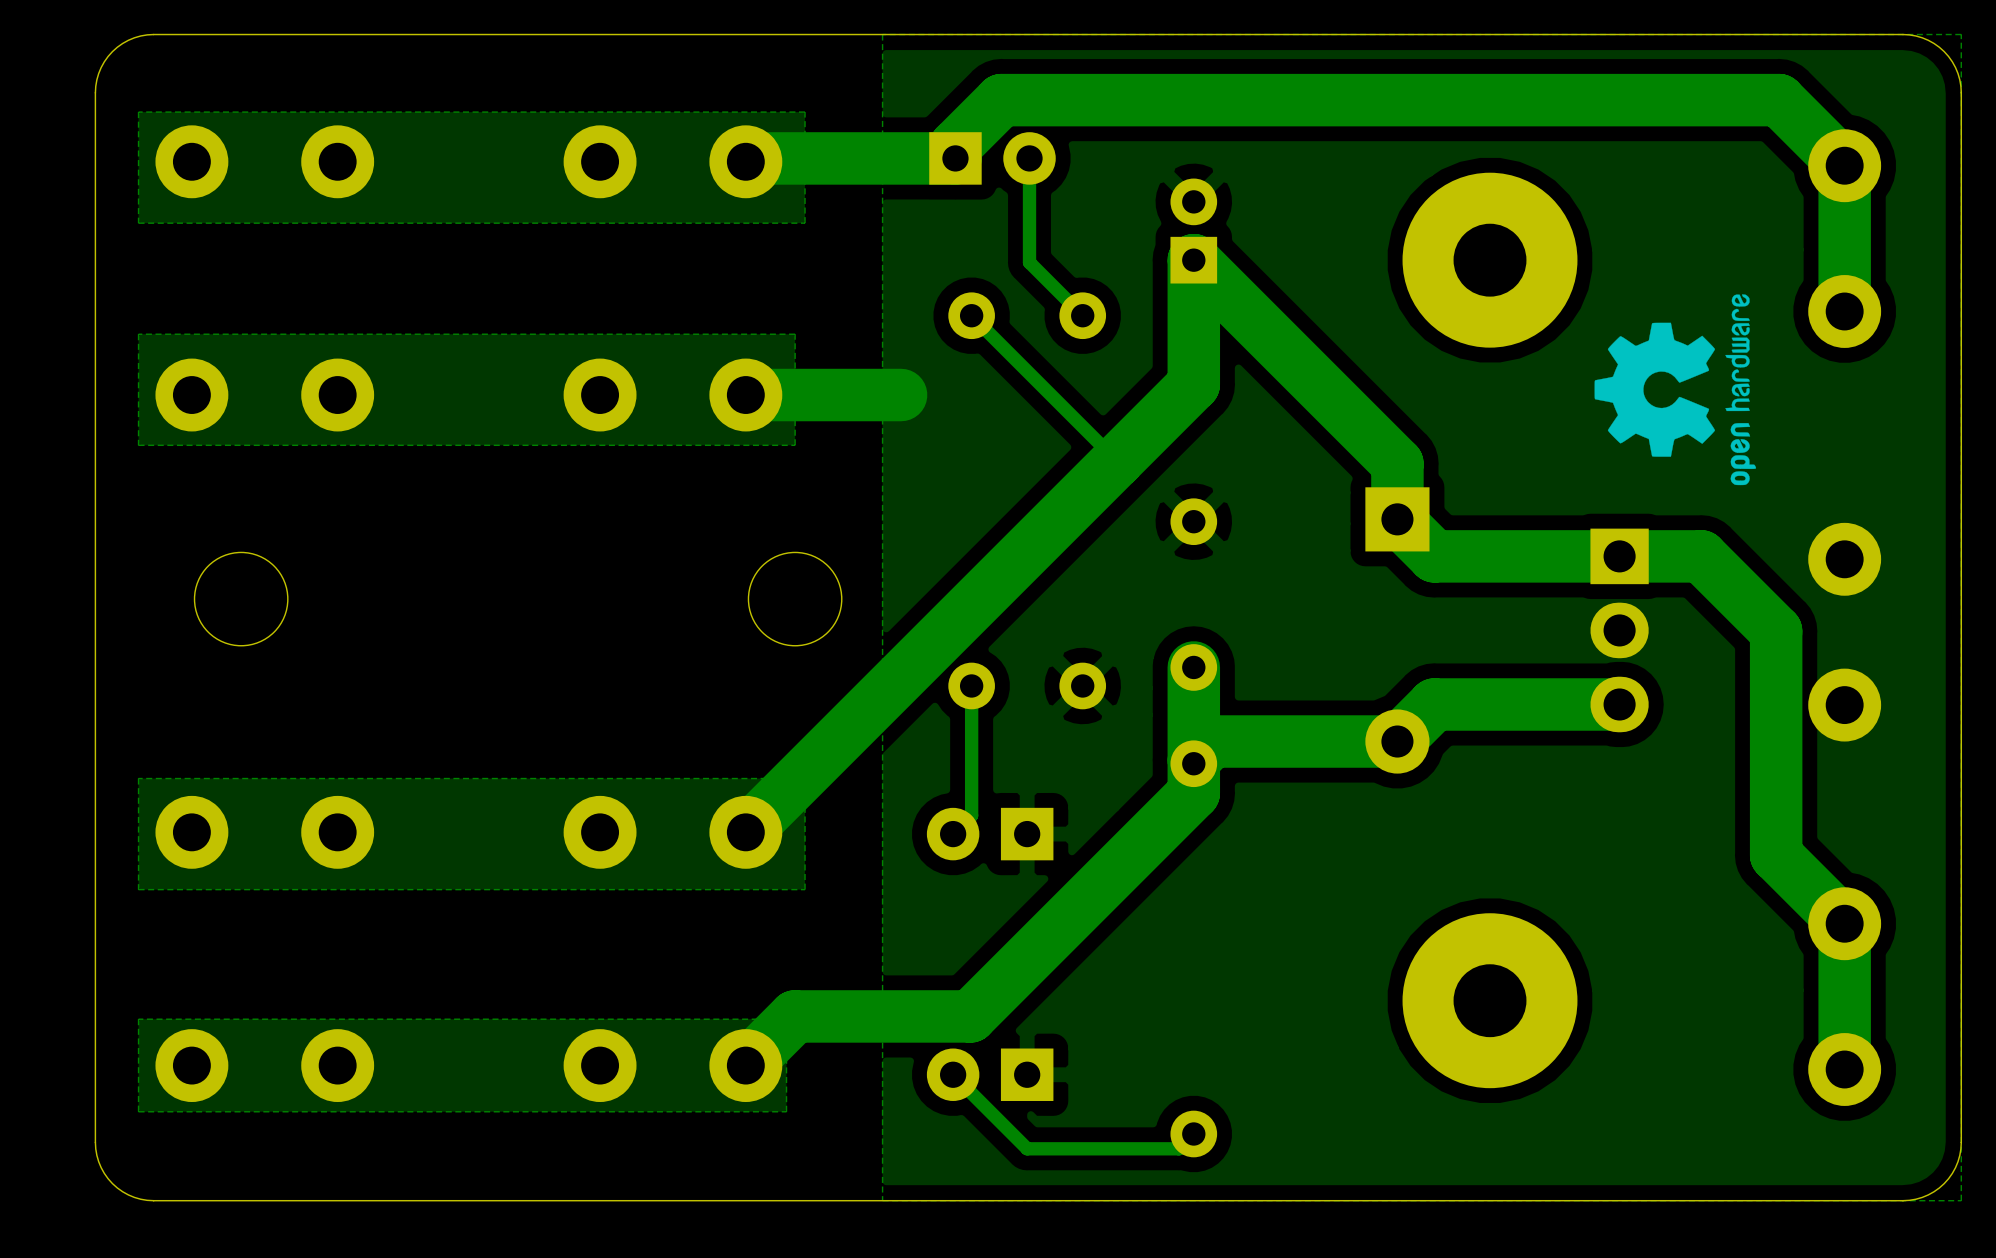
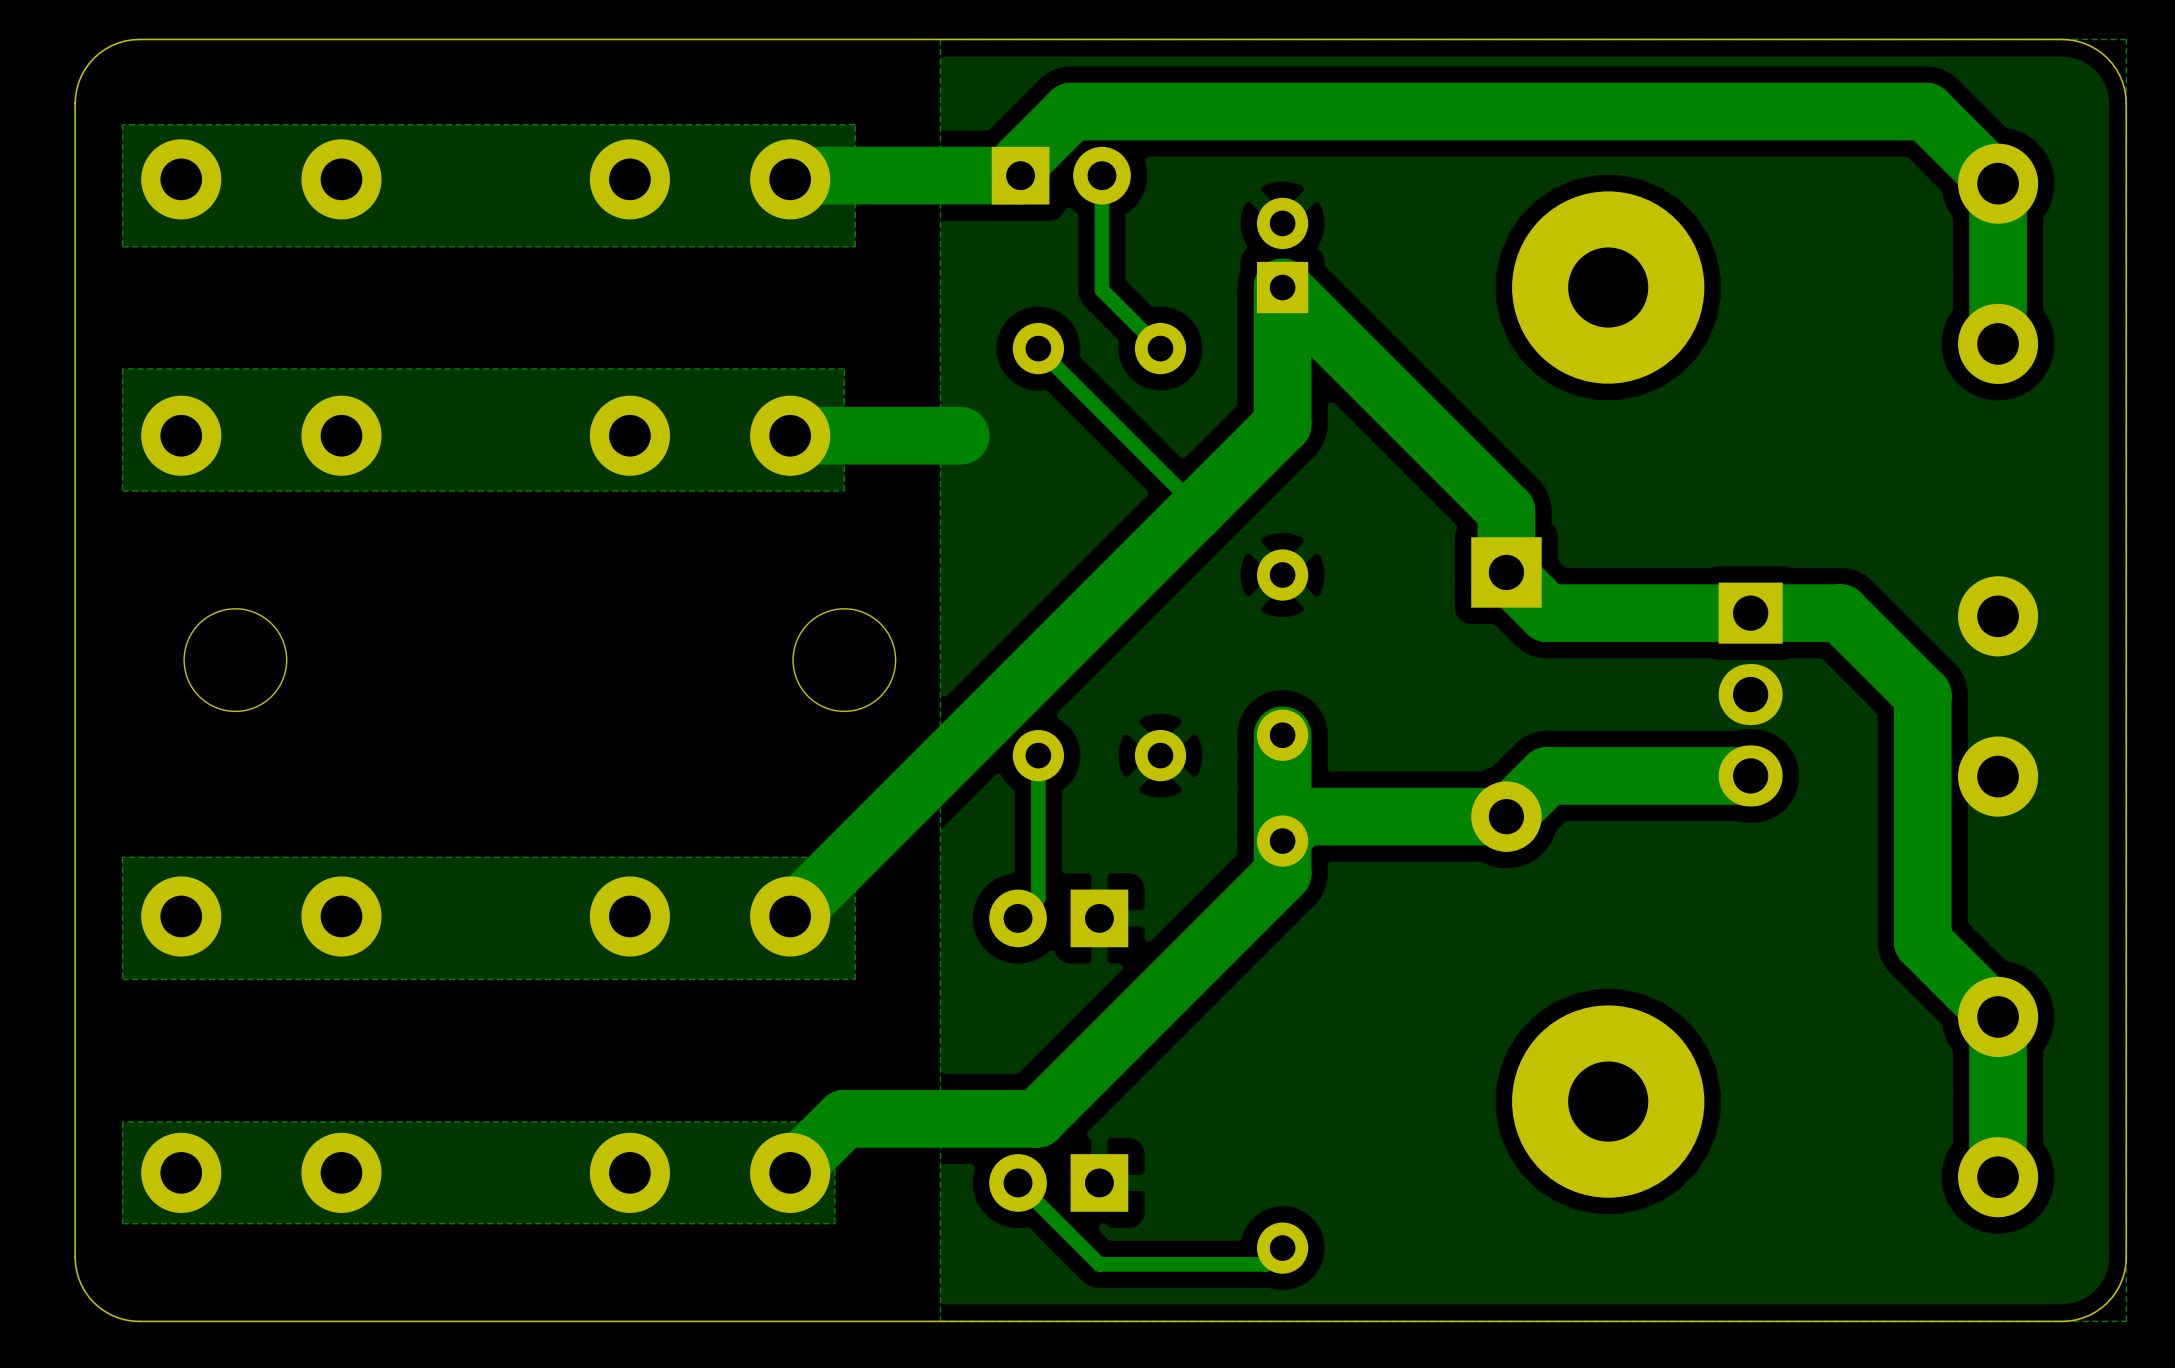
drawing: [1594, 294, 1757, 486] -> none

